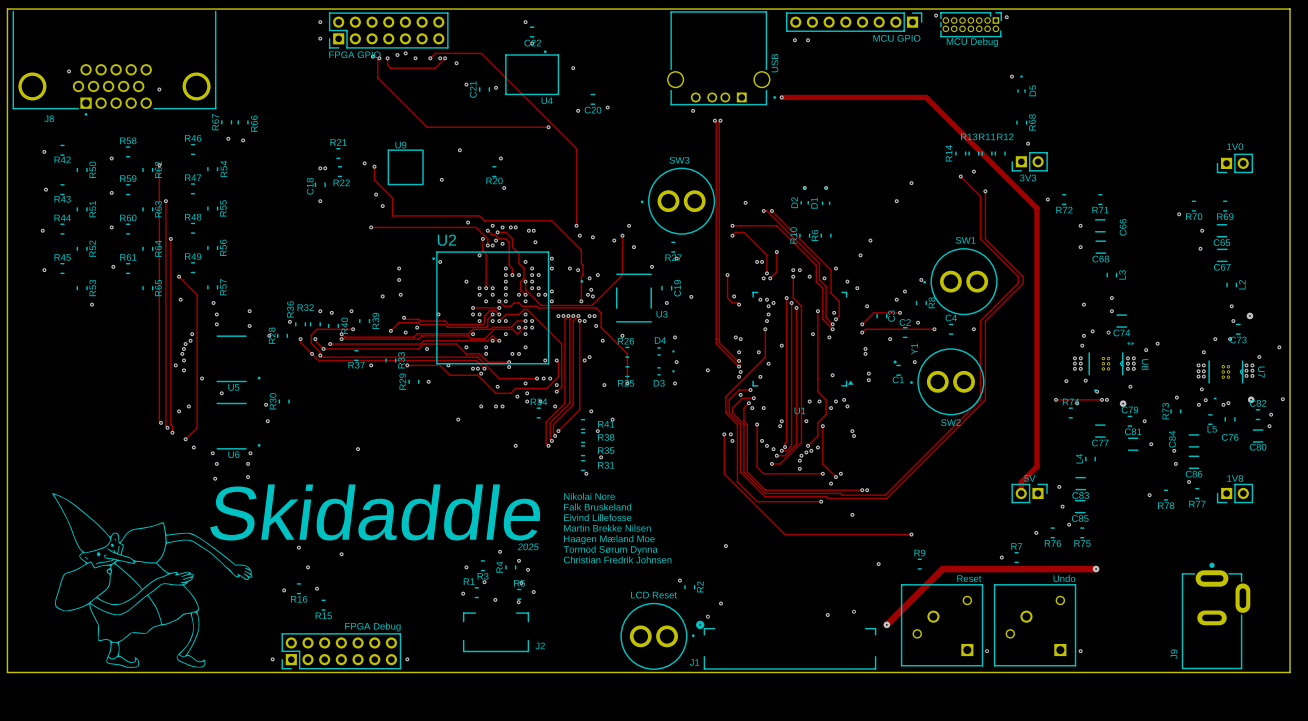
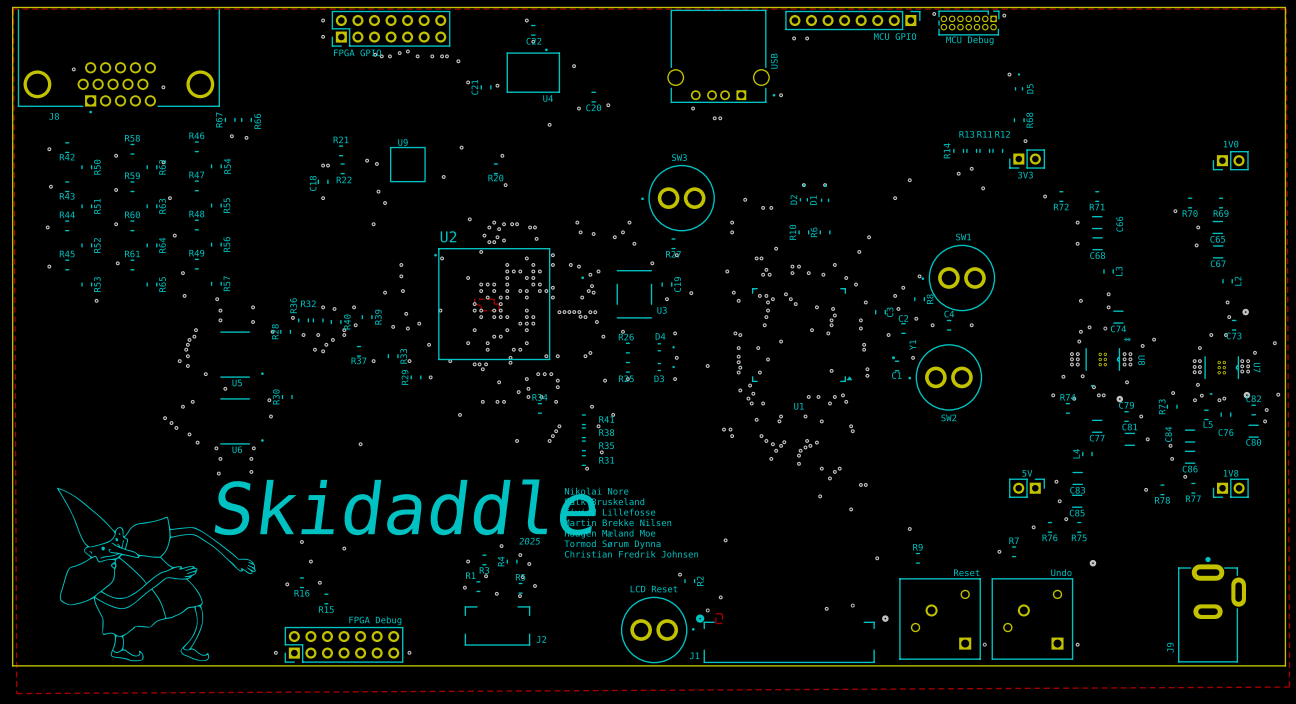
zone outline: none -> (13, 9) (1286, 9) (1289, 687) (16, 693) (13, 9)
track: (379, 58) (377, 59) (377, 78) (427, 127) (548, 127) -> none
track: (387, 58) (387, 64) (390, 68) (435, 68) (445, 58) -> none
track: (430, 58) (435, 53) (481, 53) (576, 148) (576, 225) -> none
track: (781, 97) (926, 97) (1036, 208) (1036, 466) (1021, 482) (1021, 493) -> none
track: (714, 120) (716, 339) -> none
track: (720, 120) (719, 339) -> none
track: (159, 165) (159, 421) (160, 422) -> none
track: (374, 166) (374, 179) (392, 197) (392, 215) (479, 215) (484, 220) (551, 220) (581, 250) (583, 265) (581, 301) -> none
track: (960, 176) (980, 196) (980, 238) (1018, 276) (1018, 283) (980, 321) (980, 399) (885, 495) (842, 495) (840, 493) (765, 493) (743, 472) (743, 424) (732, 413) (732, 408) (742, 398) (753, 398) -> none
track: (985, 191) (985, 238) (1023, 276) (1023, 283) (985, 321) (985, 399) (886, 498) (765, 496) (740, 472) (740, 424) (729, 413) (729, 399) (739, 390) (750, 390) -> none
track: (165, 201) (165, 426) (167, 427) -> none
track: (763, 211) (766, 211) (819, 263) (819, 279) (826, 286) (826, 317) (832, 324) -> none
track: (771, 211) (831, 270) (831, 293) (839, 301) (839, 316) (835, 319) -> none
track: (732, 225) (776, 225) (816, 265) (816, 281) (822, 288) (822, 319) (832, 329) -> none
track: (371, 227) (476, 227) (487, 238) (487, 245) -> none
track: (487, 230) (499, 238) (505, 238) (509, 242) (509, 265) (512, 268) (512, 275) -> none
track: (497, 232) (505, 232) (512, 238) (512, 247) (519, 253) (519, 263) (523, 268) (520, 289) (525, 294) -> none
track: (622, 235) (622, 275) (592, 305) (541, 305) (525, 289) (525, 281) -> none
track: (732, 235) (735, 232) (743, 232) (766, 255) (766, 273) -> none
track: (170, 238) (170, 424) (172, 432) -> none
track: (482, 238) (482, 250) (486, 253) (486, 288) -> none
track: (776, 252) (776, 271) (770, 278) -> none
track: (727, 275) (727, 298) (732, 302) (739, 304) -> none
track: (179, 276) (197, 294) (197, 427) (185, 439) -> none
track: (793, 276) (793, 298) (801, 306) (801, 442) (780, 463) (771, 463) -> none
track: (786, 298) (786, 441) (785, 447) -> none
track: (499, 301) (504, 306) (519, 302) (522, 306) (538, 307) (596, 307) (601, 312) (601, 327) (627, 353) (627, 383) -> none
zone outline: none -> (474, 299) (494, 299) (494, 304) (499, 304) (499, 310) (481, 310) (481, 305) (474, 304) (474, 299)
track: (791, 302) (791, 445) (786, 450) (781, 450) -> none
track: (473, 307) (499, 307) -> none
track: (796, 307) (796, 444) (785, 455) (776, 455) -> none
track: (817, 311) (817, 391) (826, 399) (826, 414) (817, 422) (817, 436) (808, 445) -> none
track: (900, 312) (873, 312) (862, 324) -> none
track: (492, 314) (487, 319) (486, 327) (447, 327) (445, 324) (399, 322) (390, 330) -> none
track: (499, 314) (495, 311) (489, 311) (484, 316) (482, 324) (448, 324) (445, 321) (420, 321) (404, 317) -> none
track: (568, 315) (564, 319) (564, 403) (546, 422) (546, 443) (548, 445) -> none
track: (573, 315) (569, 319) (569, 403) (550, 422) (551, 440) -> none
track: (578, 315) (573, 321) (573, 404) (553, 424) (555, 436) -> none
track: (579, 320) (579, 409) (558, 431) -> none
track: (499, 321) (505, 314) (519, 314) (523, 309) (527, 309) (561, 344) (561, 386) (556, 391) -> none
track: (525, 321) (517, 321) (511, 327) (473, 329) (468, 333) (417, 333) (413, 337) (344, 337) (341, 334) -> none
track: (525, 327) (517, 334) (512, 329) (494, 329) (484, 338) (471, 338) (468, 335) (422, 335) (418, 339) (341, 339) -> none
track: (353, 329) (317, 329) (311, 335) (311, 343) (320, 352) (321, 357) (477, 357) (499, 378) (537, 378) -> none
track: (765, 329) (765, 357) (725, 396) (725, 413) (737, 424) (737, 481) (757, 501) (821, 501) -> none
track: (934, 329) (865, 329) (862, 332) -> none
track: (300, 339) (300, 342) (318, 360) (476, 360) (484, 368) -> none
track: (315, 339) (323, 348) (418, 348) (423, 344) (456, 344) (466, 353) (479, 353) (487, 362) (509, 362) -> none
track: (716, 339) (716, 343) (739, 367) -> none
track: (719, 339) (719, 342) (740, 362) -> none
track: (499, 340) (492, 335) (487, 340) (423, 340) (420, 344) (330, 344) -> none
track: (556, 360) (558, 376) (546, 388) (515, 388) (510, 393) (496, 393) (477, 375) (450, 375) (440, 365) (407, 365) -> none
track: (1056, 399) (1102, 399) -> none
track: (748, 403) (743, 408) (743, 421) (747, 424) (747, 472) (765, 490) (862, 490) -> none
track: (757, 424) (757, 467) (763, 473) (822, 473) -> none
track: (822, 426) (822, 463) (835, 477) -> none
track: (724, 434) (724, 473) (785, 534) (911, 534) -> none
track: (1096, 569) (942, 569) (886, 624) -> none
zone outline: none -> (715, 613) (722, 613) (722, 623) (715, 623) (715, 613)

